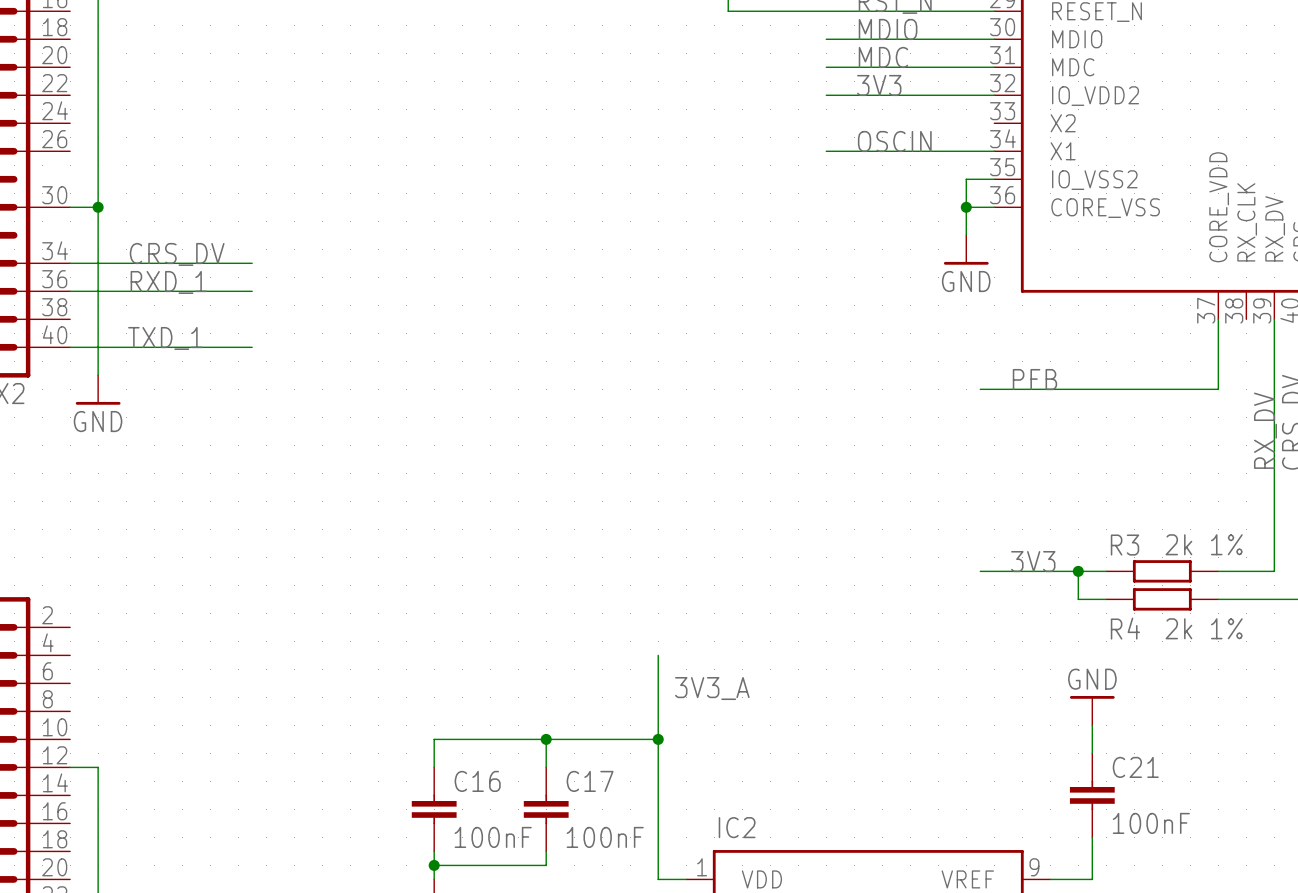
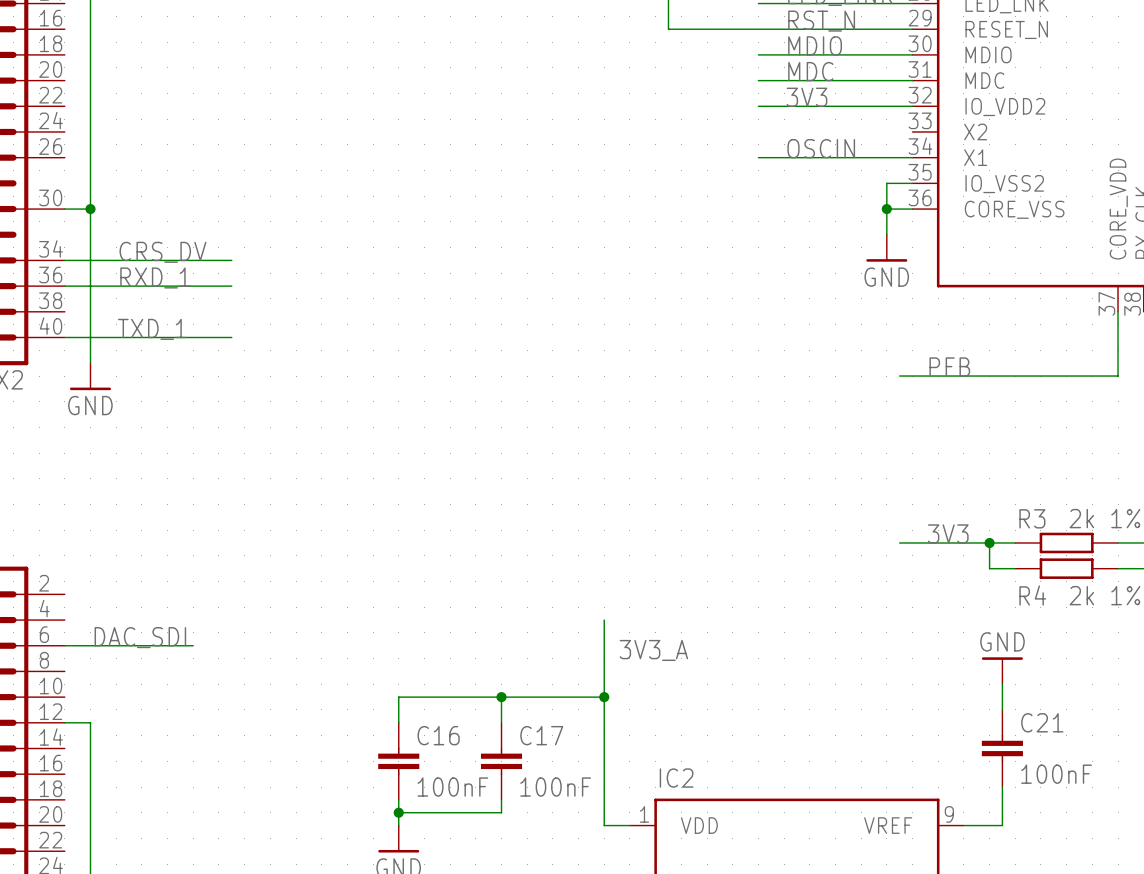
label: none -> DAC_SDI (140, 637)
wire: none -> (64, 645) (193, 645)

